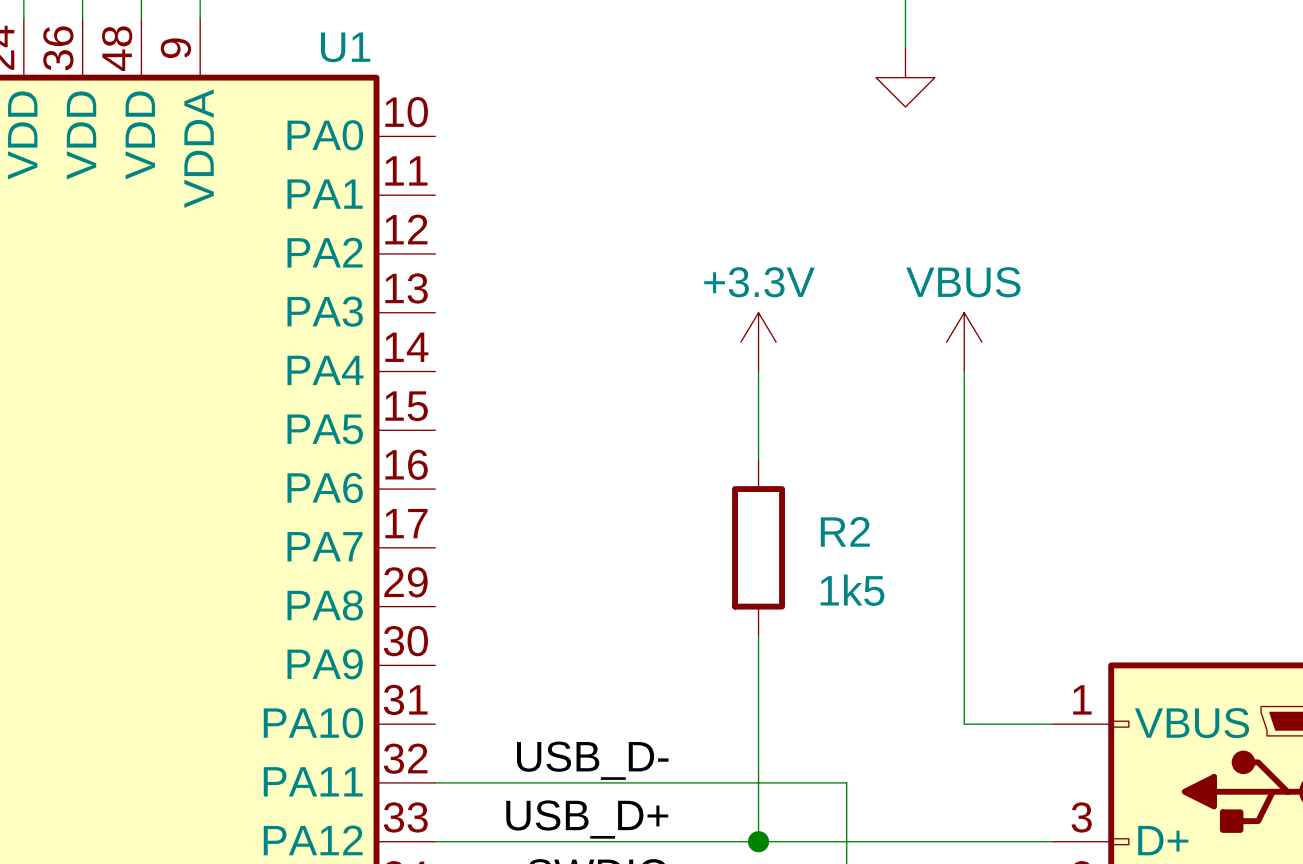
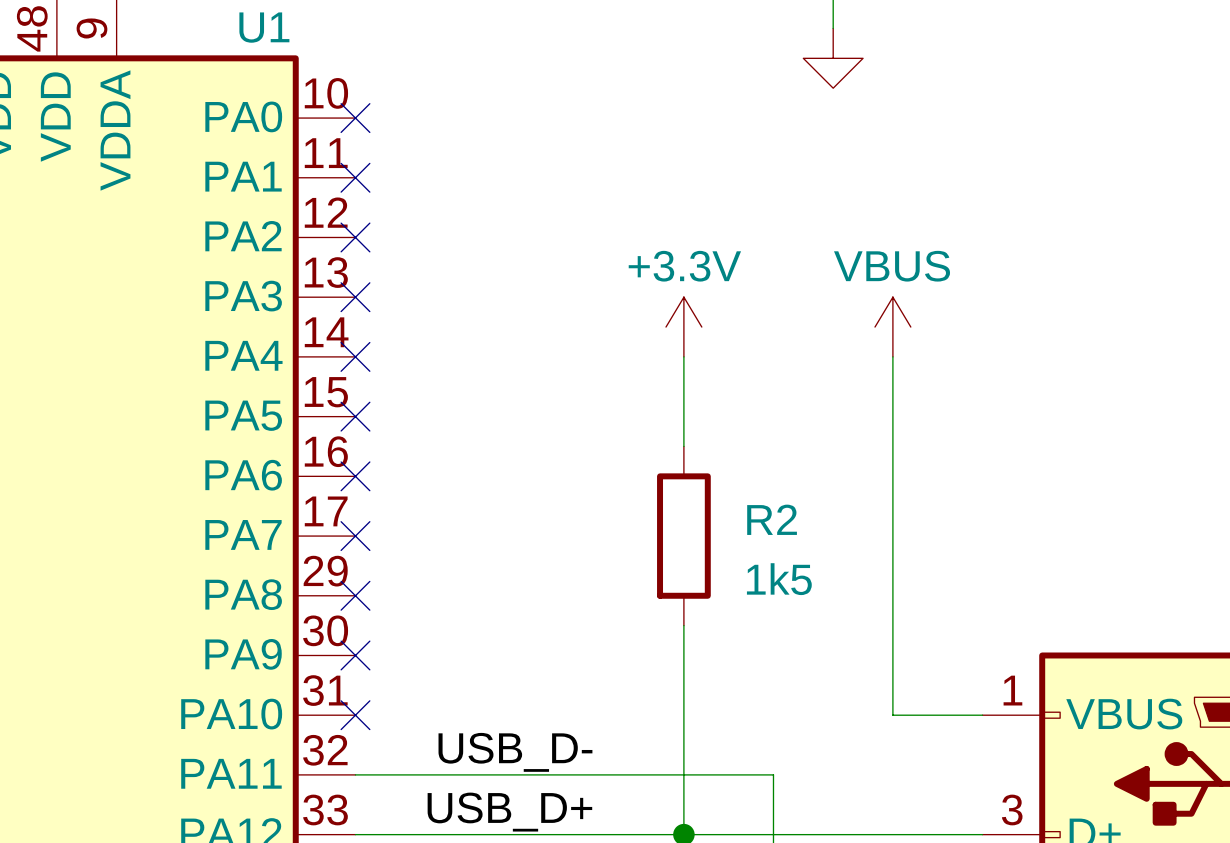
no-connect mark: none -> (355, 118)
no-connect mark: none -> (355, 177)
no-connect mark: none -> (355, 237)
no-connect mark: none -> (355, 297)
no-connect mark: none -> (355, 356)
no-connect mark: none -> (355, 416)
no-connect mark: none -> (355, 476)
no-connect mark: none -> (355, 536)
no-connect mark: none -> (355, 595)
no-connect mark: none -> (355, 655)
no-connect mark: none -> (355, 715)

